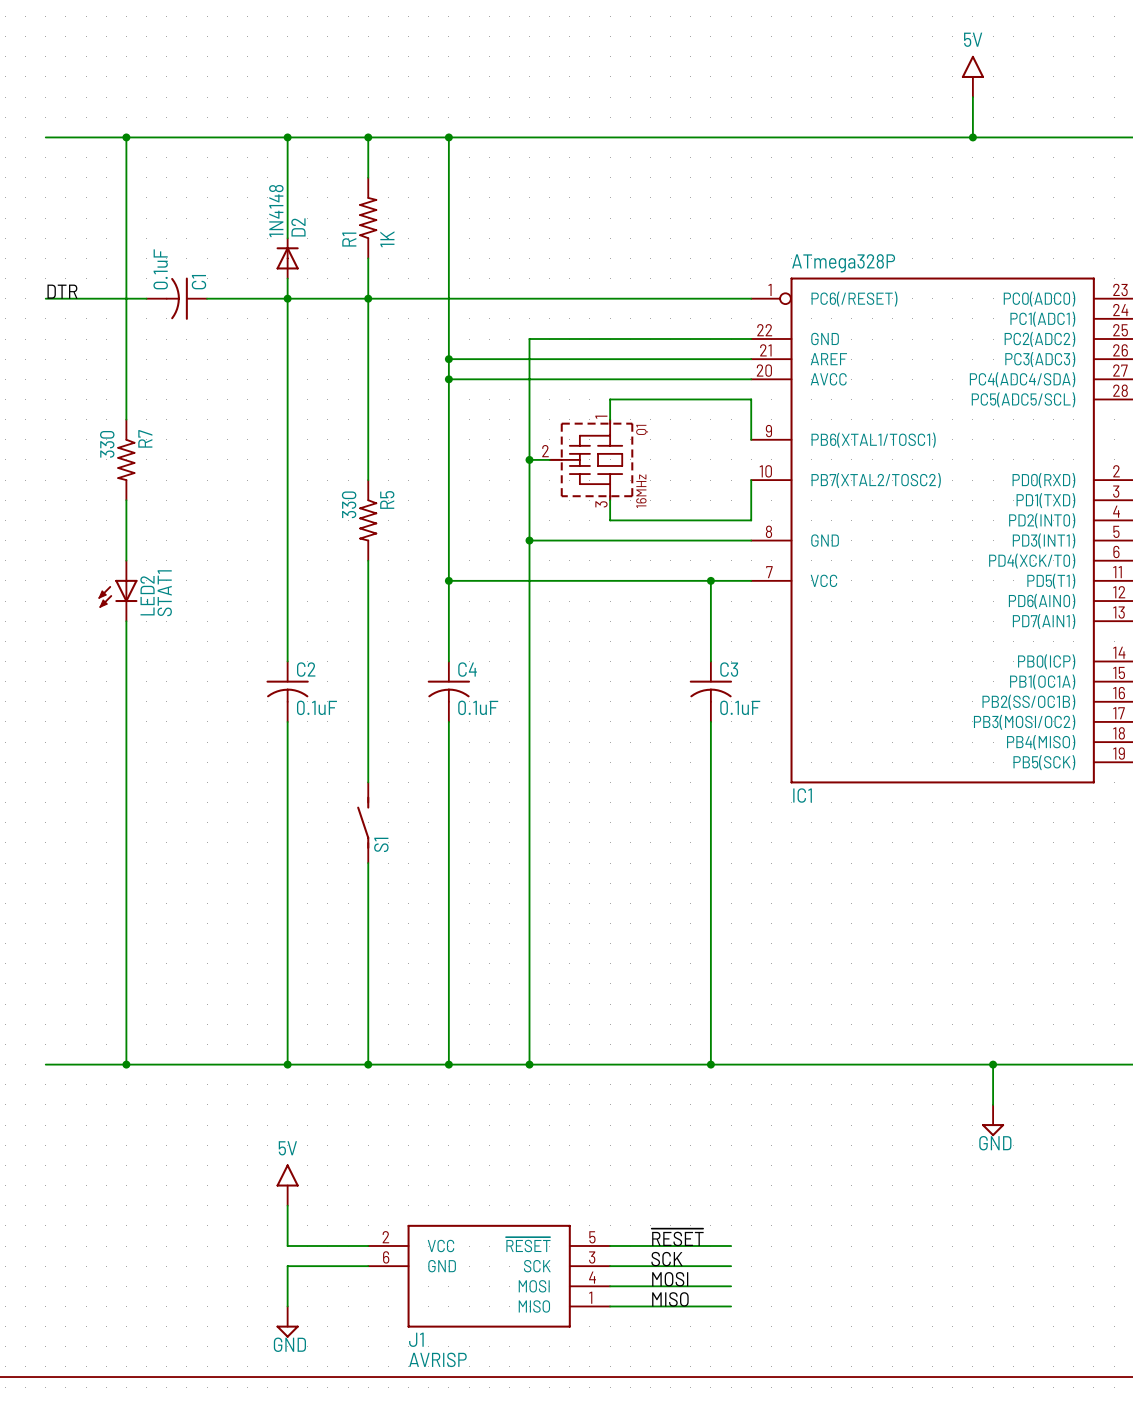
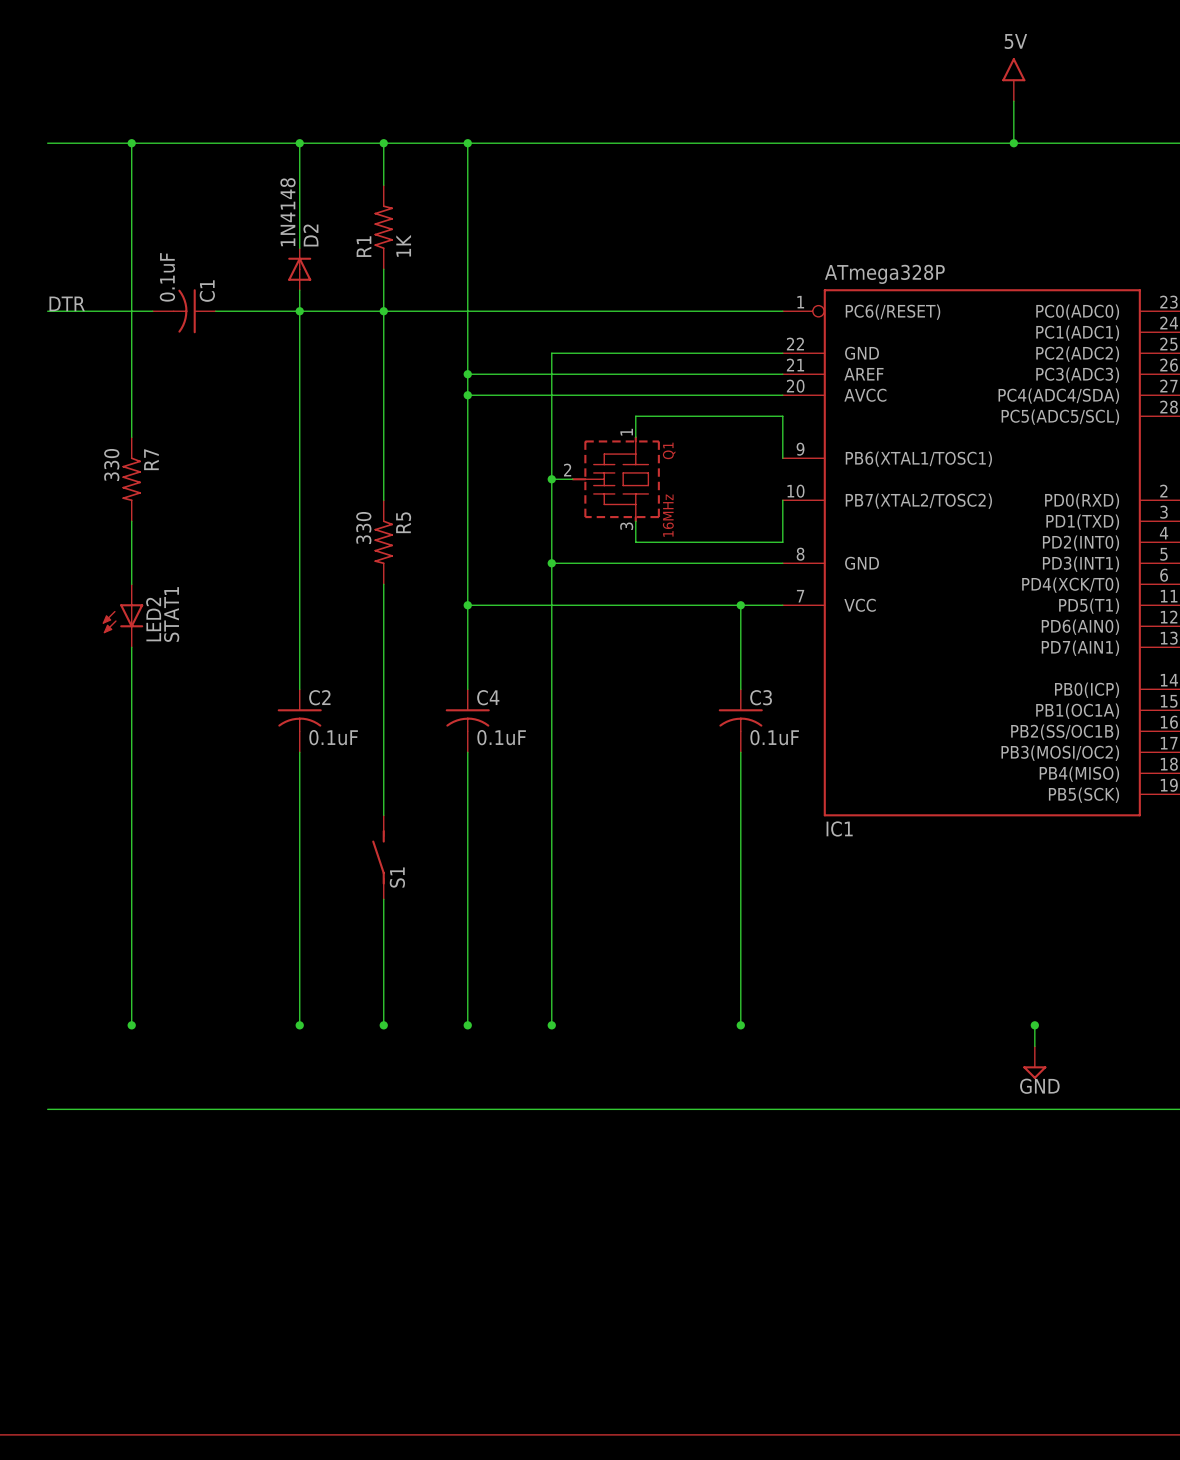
wire: (126, 983) (126, 1064) -> none
junction: none -> (131, 1025)
wire: (287, 983) (287, 1064) -> none
junction: none -> (299, 1025)
wire: (368, 983) (368, 1064) -> none
junction: none -> (383, 1025)
wire: (448, 983) (448, 1064) -> none
junction: none -> (467, 1025)
wire: (529, 983) (529, 1064) -> none
junction: none -> (551, 1025)
wire: (710, 983) (710, 1064) -> none
junction: none -> (740, 1025)
wire: none -> (1034, 1025) (1034, 1046)
junction: none -> (1034, 1025)
junction: (126, 1064) -> none
junction: (287, 1064) -> none
junction: (368, 1064) -> none
junction: (448, 1064) -> none
junction: (529, 1064) -> none
junction: (710, 1064) -> none
wire: (993, 1064) (993, 1104) -> none
junction: (993, 1064) -> none
power symbol position: GND (993, 1120) -> GND (1034, 1062)
power symbol: (287, 1185) -> none
wire: (287, 1205) (287, 1246) (368, 1246) -> none
label: ~{RESET} (677, 1237) -> none
wire: (610, 1246) (731, 1246) -> none
label: SCK (667, 1259) -> none
wire: (368, 1266) (287, 1266) (287, 1306) -> none
wire: (610, 1266) (731, 1266) -> none
J1: AVRISP (489, 1276) -> none
label: MOSI (670, 1279) -> none
wire: (610, 1286) (731, 1286) -> none
label: MISO (670, 1299) -> none
wire: (610, 1306) (731, 1306) -> none
power symbol: GND (287, 1322) -> none

